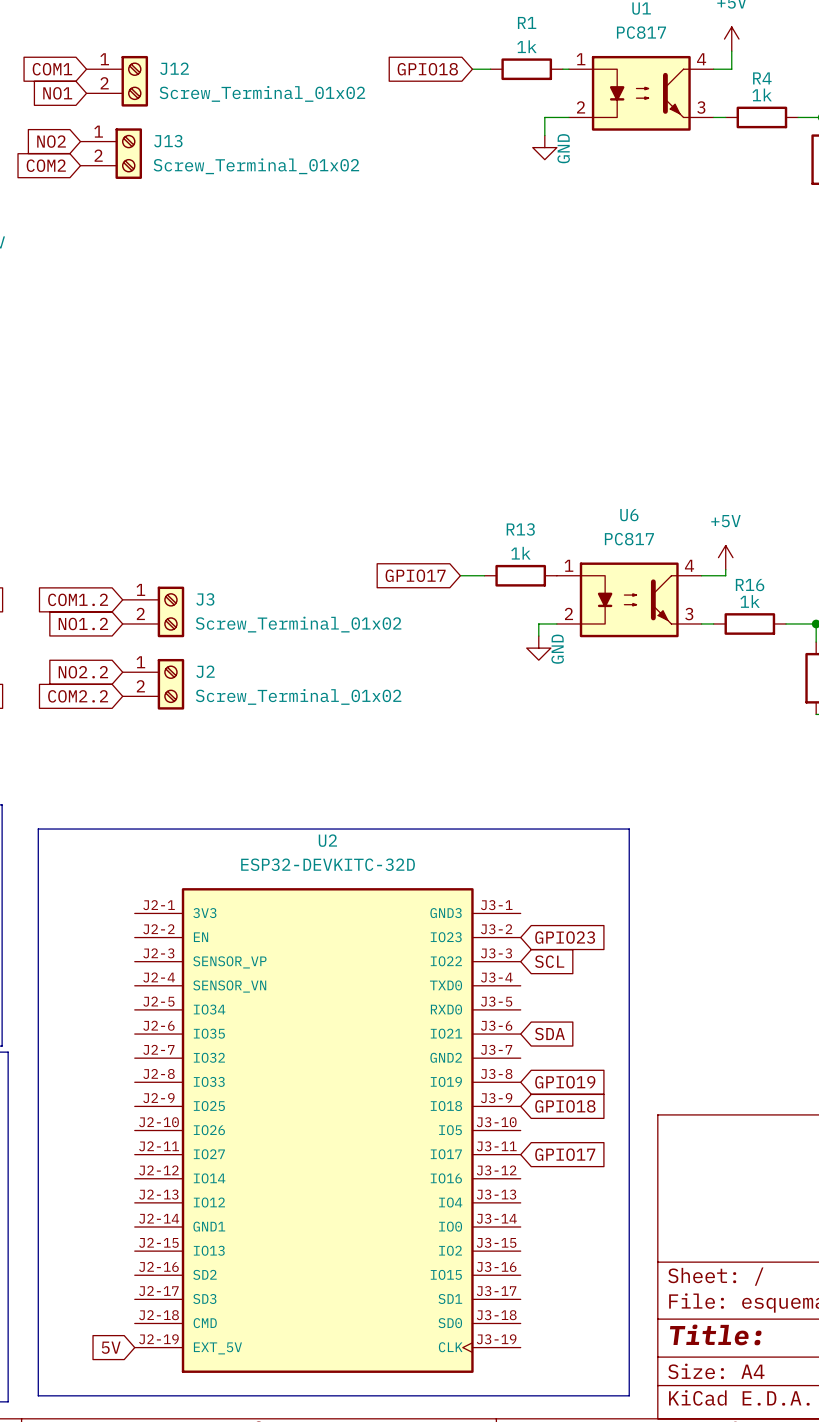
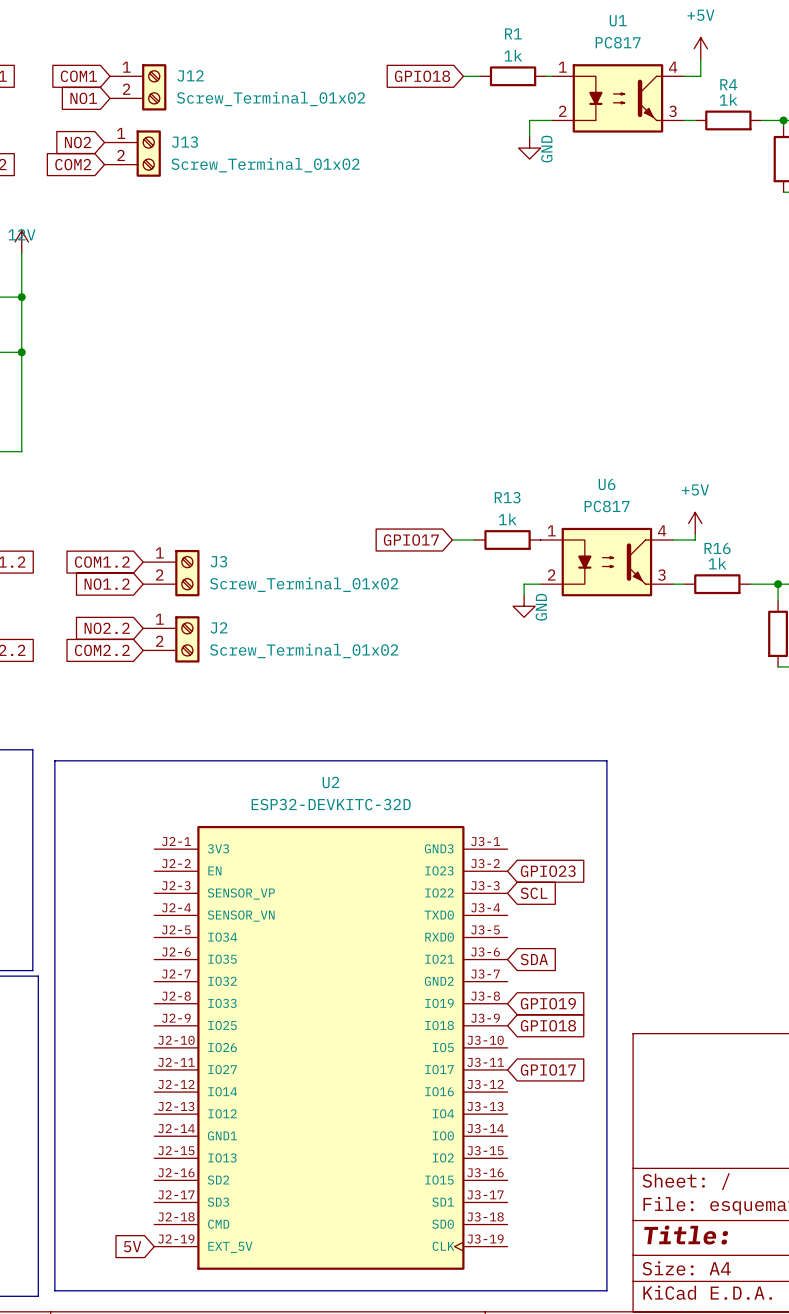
bus: (629, 829) (38, 829) (38, 1395) -> (606, 771) (606, 760) (54, 760) (54, 1290) (65, 1290)

